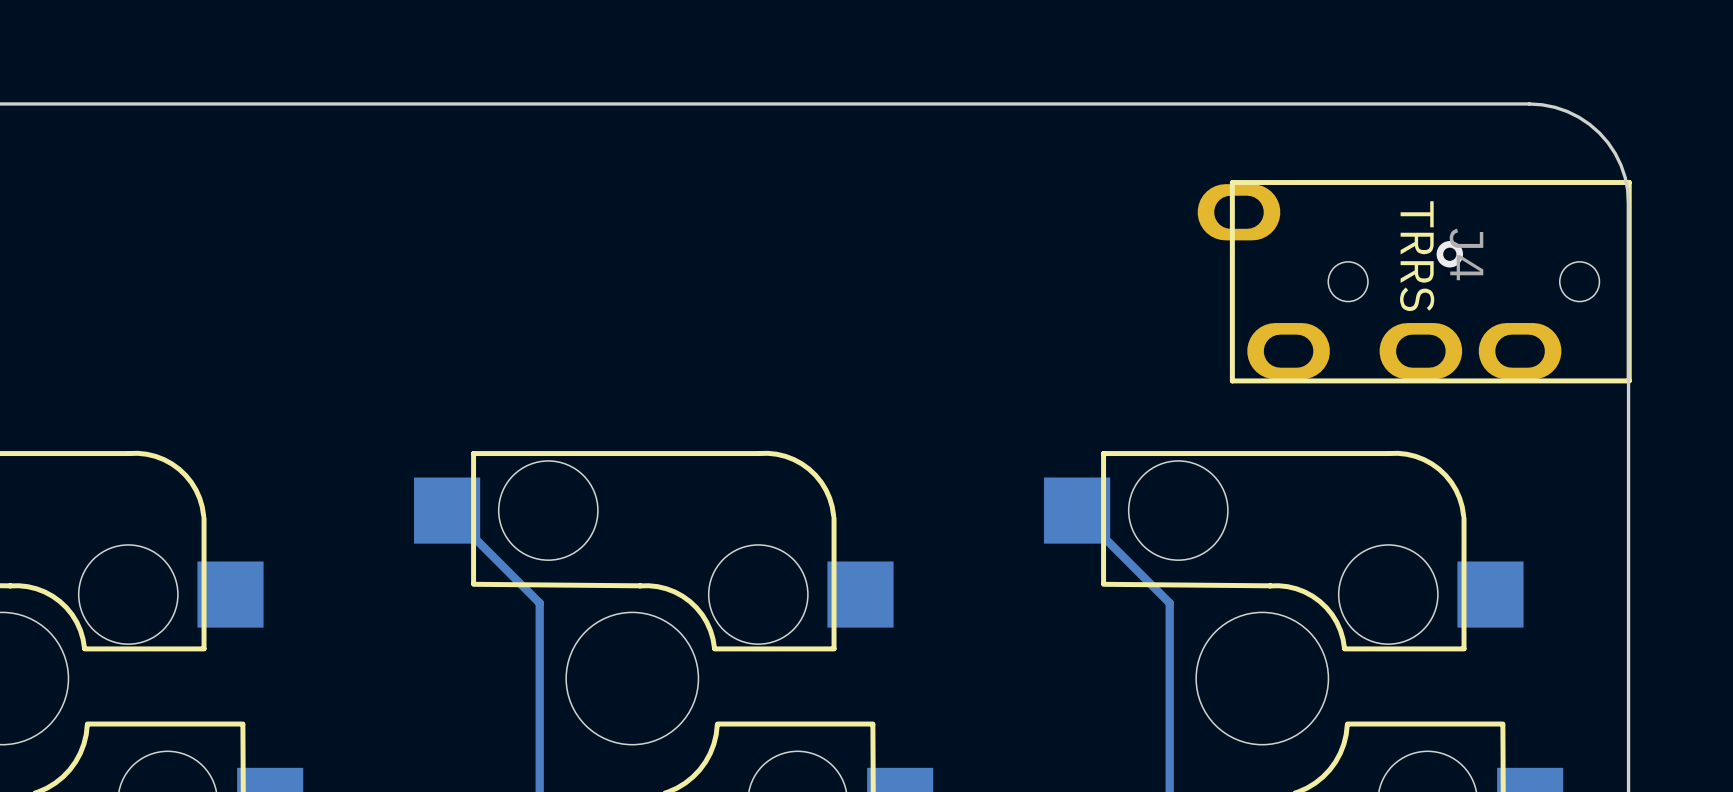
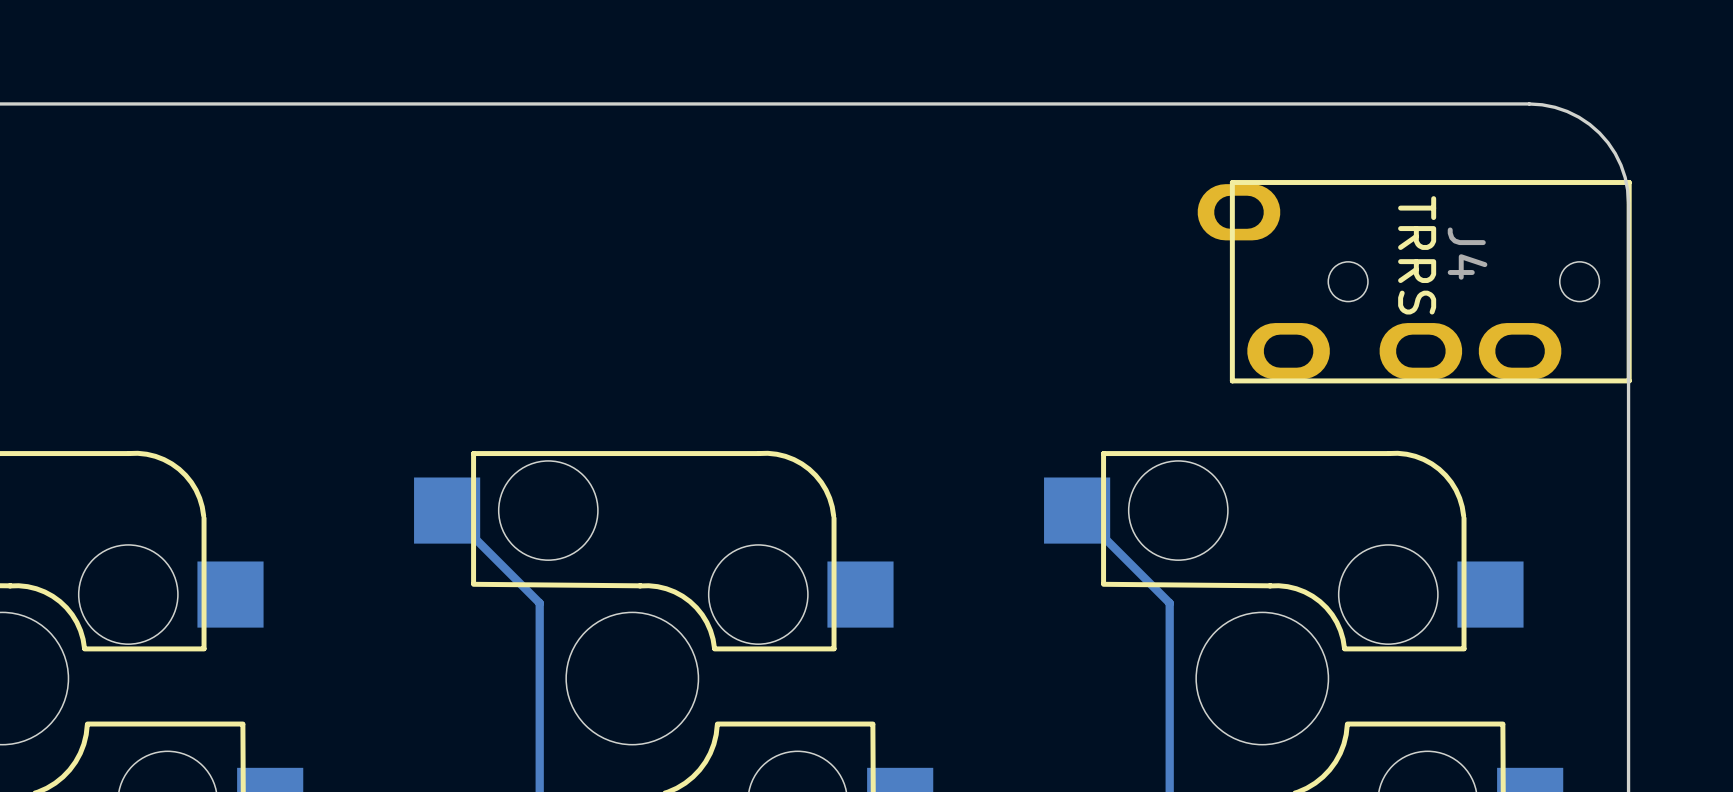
via: (1449, 254) -> none

